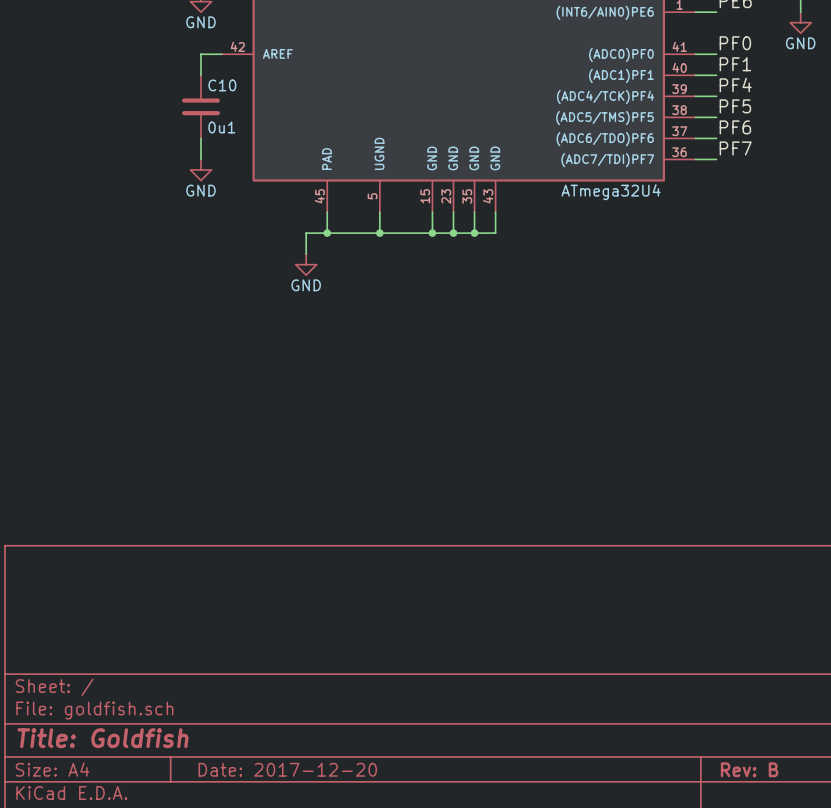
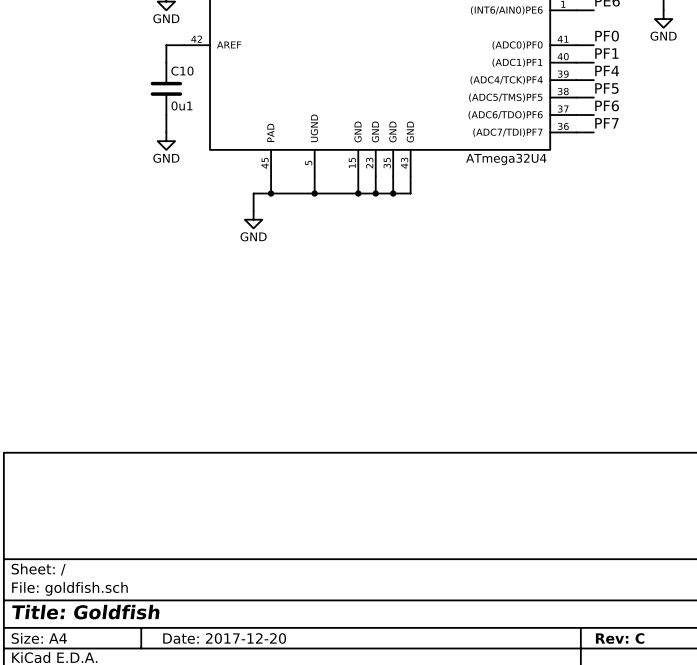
title block: Rev: B (749, 769) -> Rev: C (620, 638)

